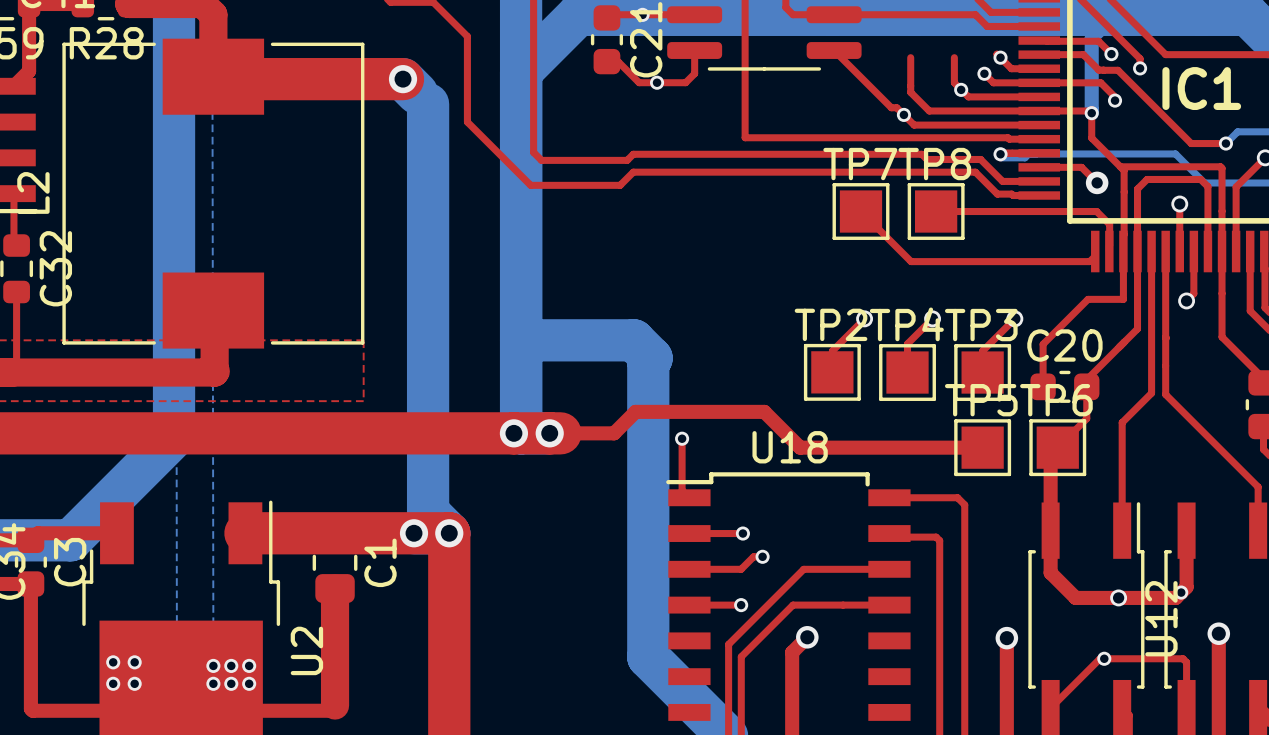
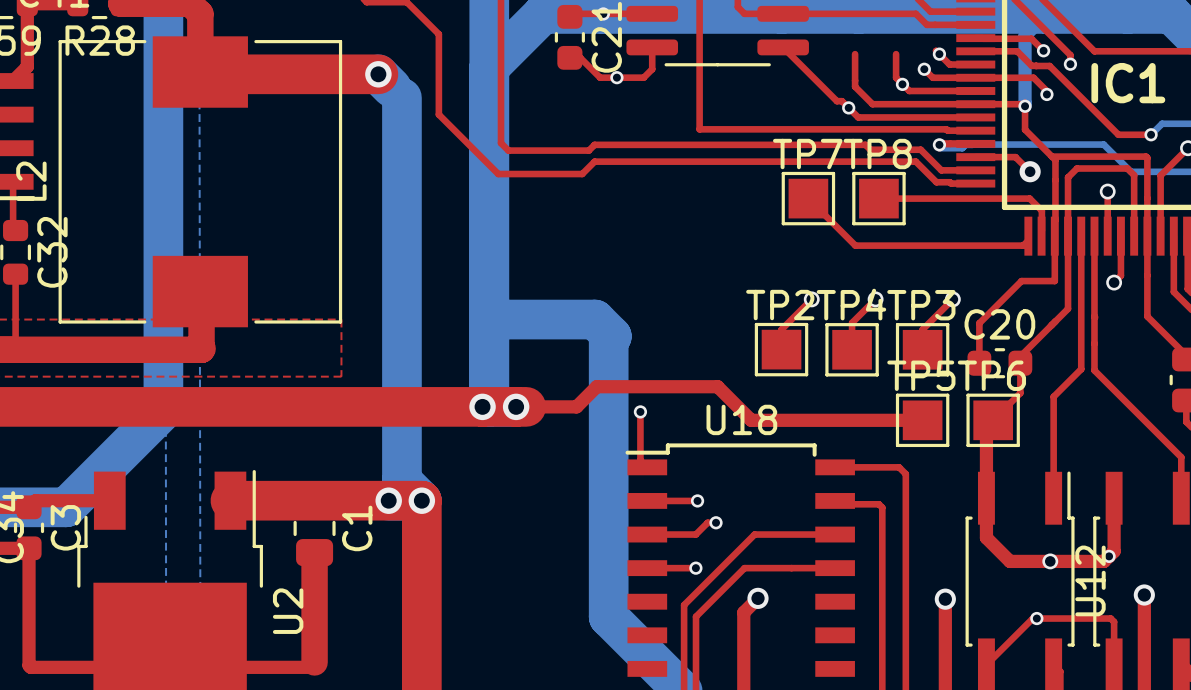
via: (113, 662) -> none
via: (134, 662) -> none
via: (213, 665) -> none
via: (231, 665) -> none
via: (249, 665) -> none
via: (113, 683) -> none
via: (134, 683) -> none
via: (213, 683) -> none
via: (231, 683) -> none
via: (249, 683) -> none

